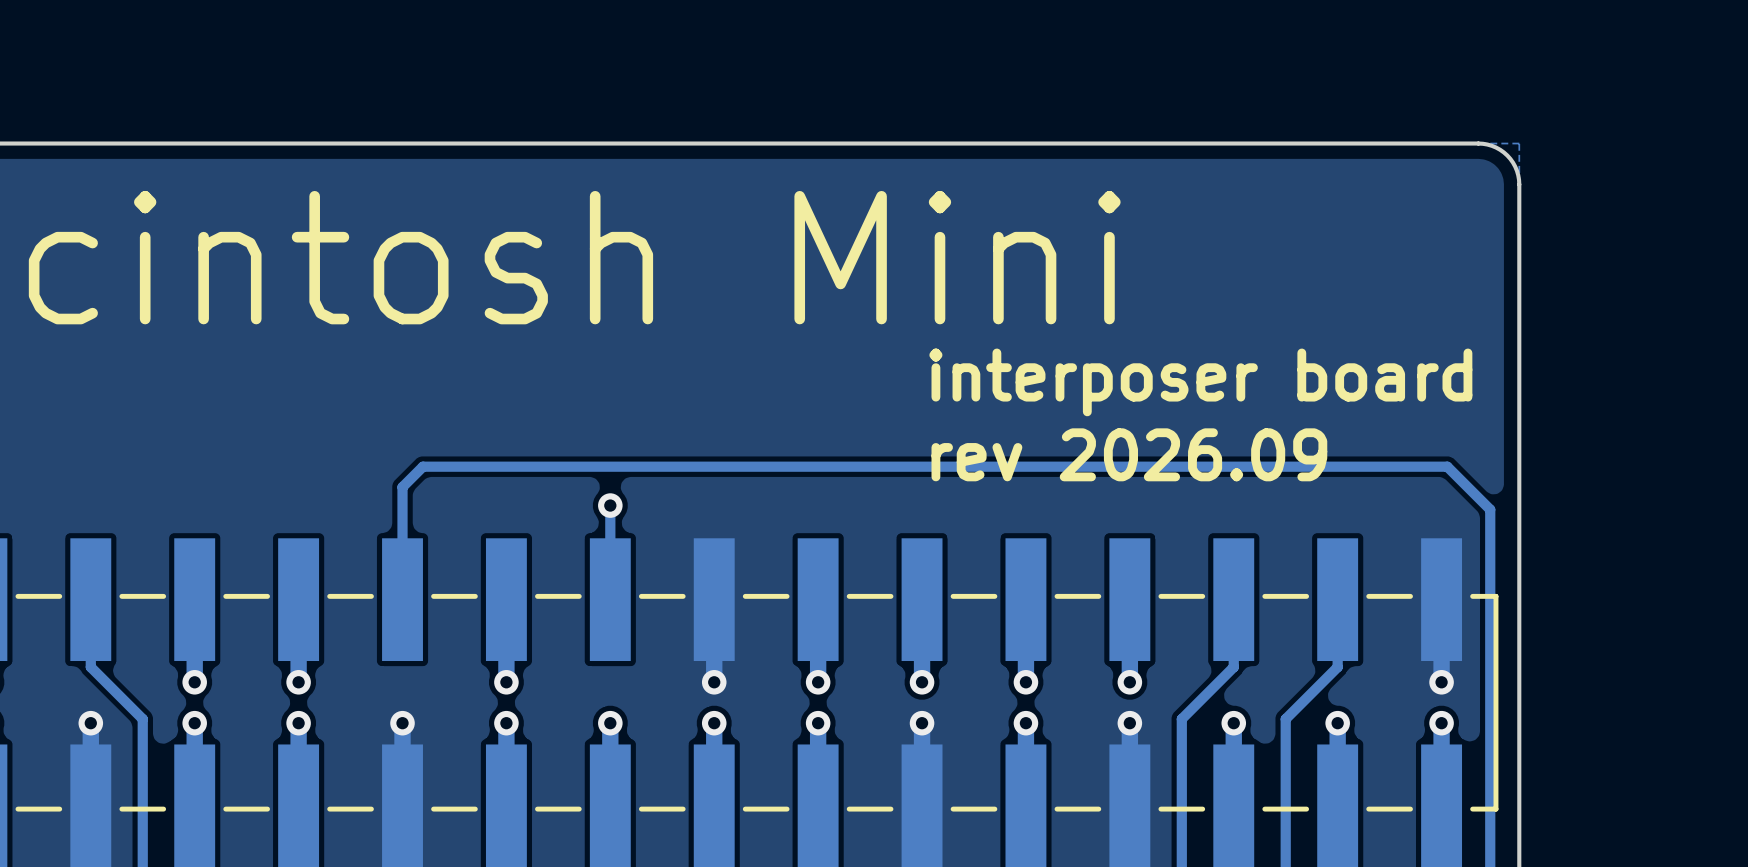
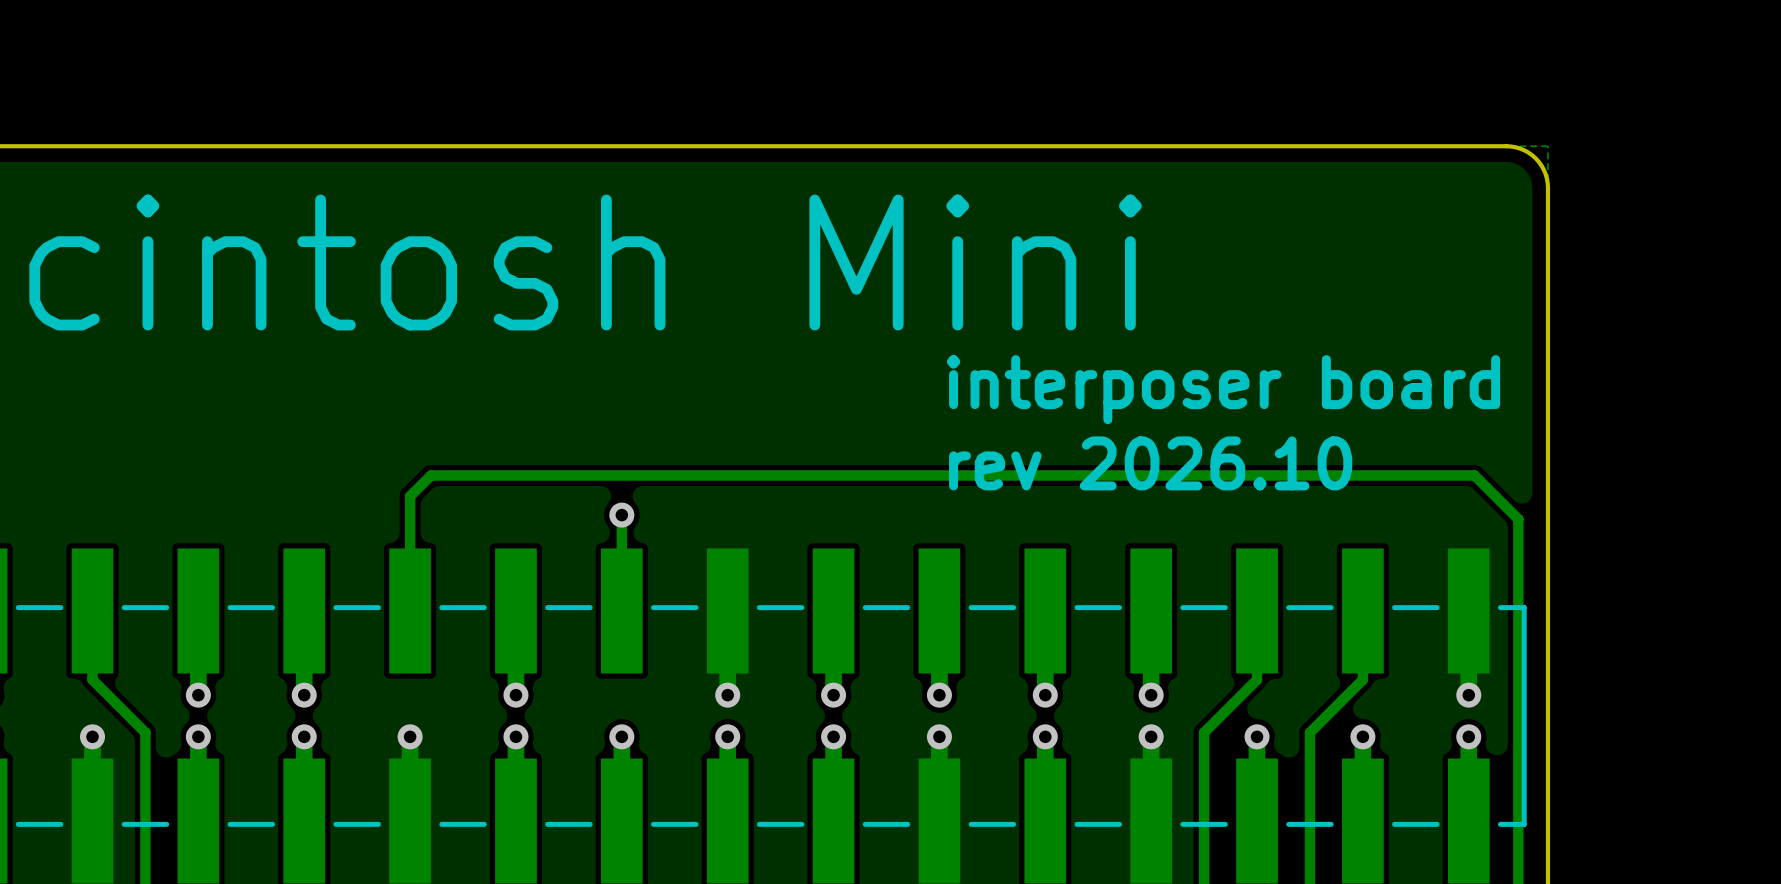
text: rev 2026.09 (1129, 454) -> rev 2026.10 (1150, 463)

